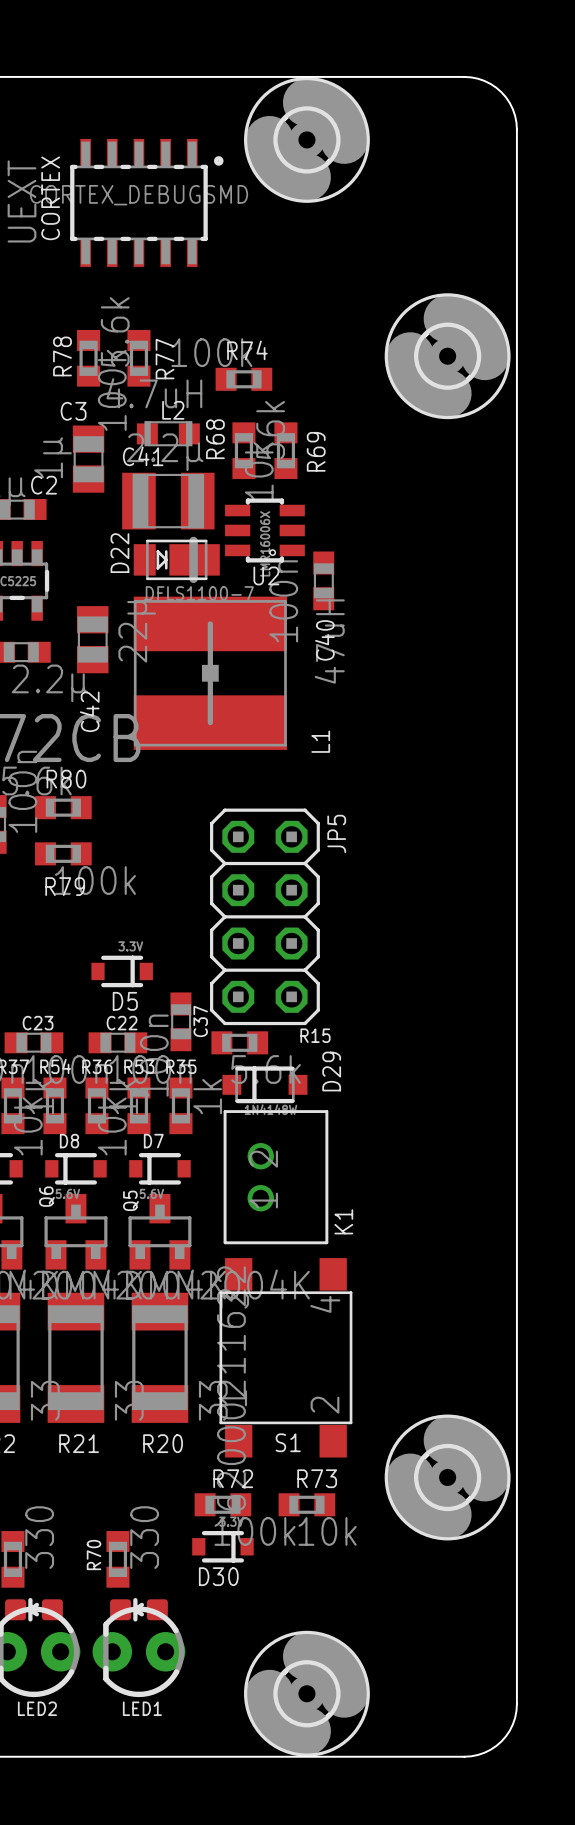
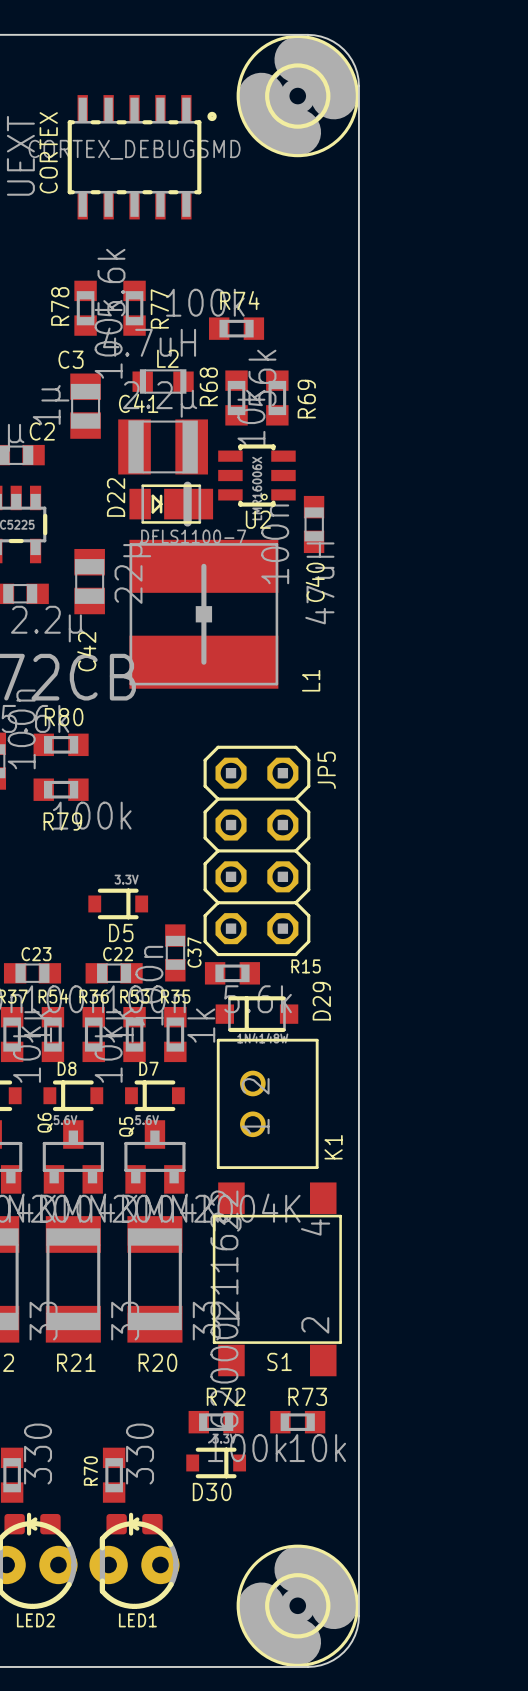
board edge: (317, 76) (464, 76) (478, 78) (490, 83) (506, 97) (512, 109) (516, 129) (516, 1711) (509, 1730) (501, 1741) (490, 1749) (478, 1754) (464, 1756) (317, 1756) -> (307, 34) (327, 38) (344, 49) (355, 66) (358, 85) (358, 1615) (355, 1635) (344, 1652) (327, 1663) (307, 1666)
part: (447, 356) -> none
part: (447, 1477) -> none

